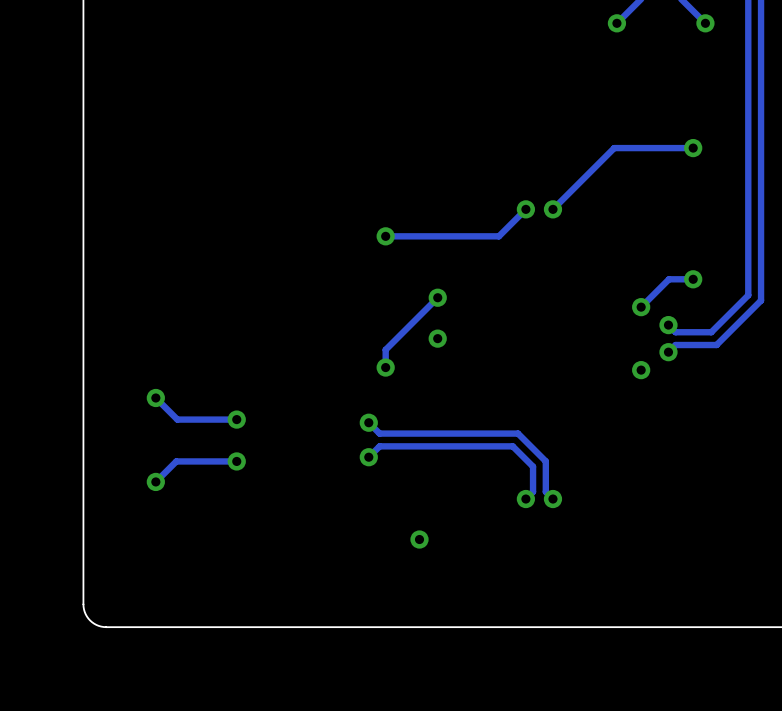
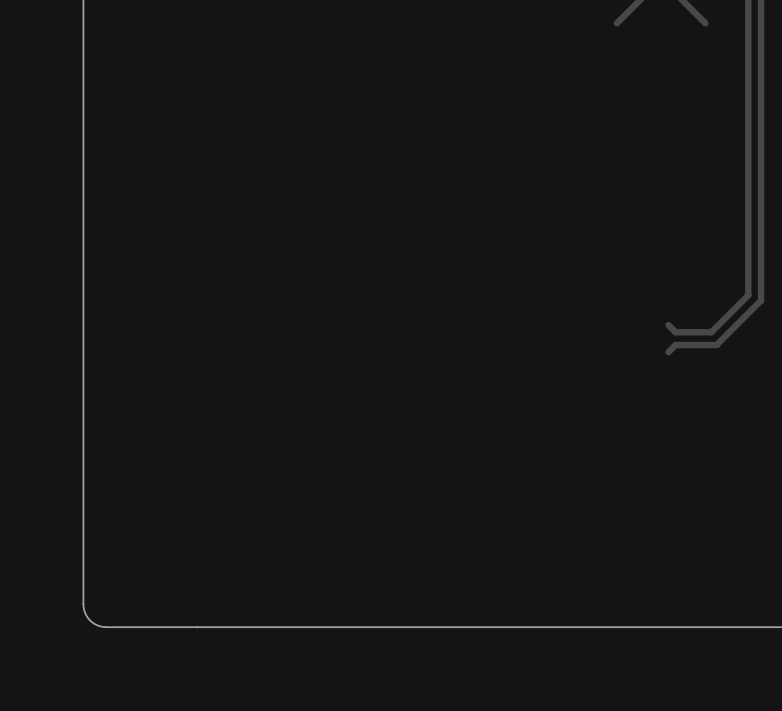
via: (616, 23) -> none
via: (705, 23) -> none
track: (693, 148) (614, 148) (552, 209) -> none
via: (693, 148) -> none
track: (525, 209) (498, 236) (385, 236) -> none
via: (525, 209) -> none
via: (552, 209) -> none
via: (385, 236) -> none
track: (693, 279) (669, 279) (641, 307) -> none
via: (693, 279) -> none
track: (437, 297) (385, 349) (385, 367) -> none
via: (437, 297) -> none
via: (641, 307) -> none
via: (668, 325) -> none
via: (437, 338) -> none
via: (668, 352) -> none
via: (385, 367) -> none
via: (641, 370) -> none
track: (155, 398) (177, 419) (236, 419) -> none
via: (155, 398) -> none
via: (236, 419) -> none
track: (368, 422) (379, 433) (518, 433) (545, 461) (545, 491) (552, 499) -> none
via: (368, 422) -> none
track: (368, 457) (379, 446) (512, 446) (533, 466) (533, 491) (525, 499) -> none
via: (368, 457) -> none
track: (236, 461) (176, 461) (155, 481) -> none
via: (236, 461) -> none
via: (155, 481) -> none
via: (525, 499) -> none
via: (552, 499) -> none
via: (419, 539) -> none

